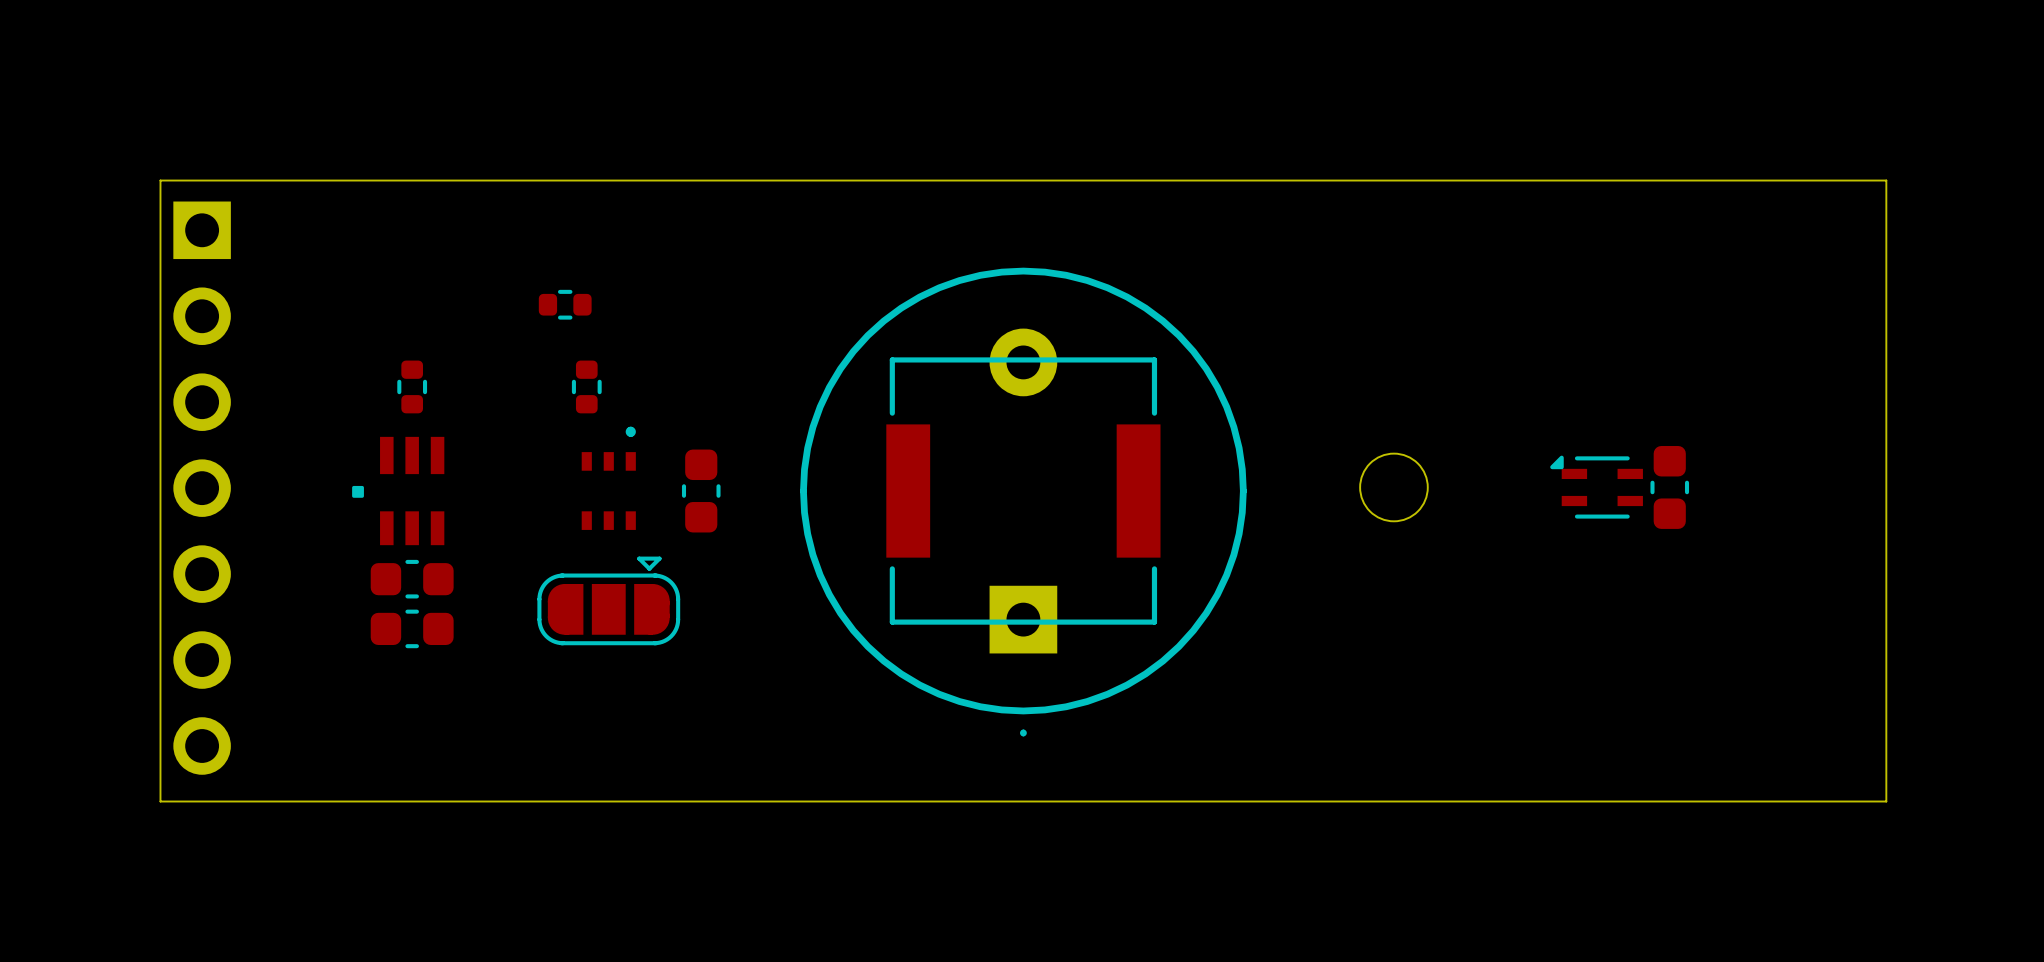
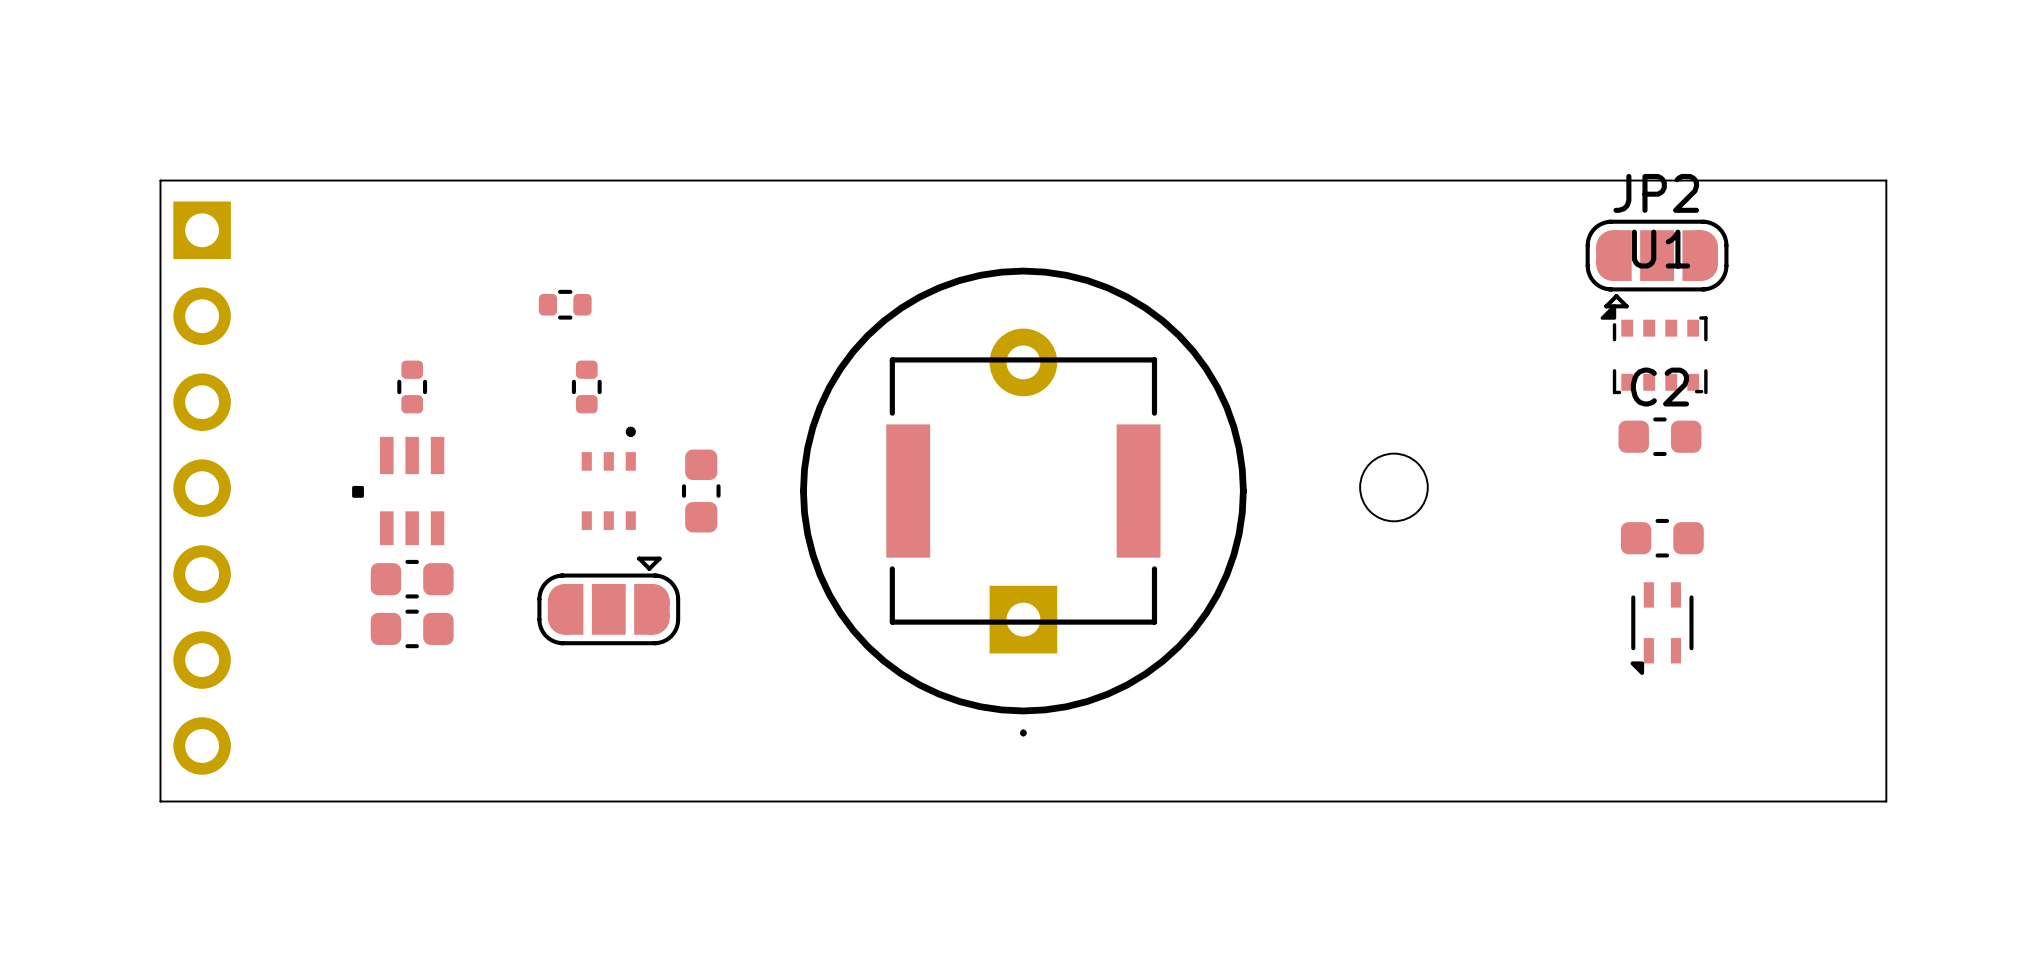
JP2: none -> (1657, 264)
U1: none -> (1654, 349)
C2: none -> (1659, 436)
part rotation: 0° (1596, 487) -> 90° counterclockwise (1662, 628)
part position: (1596, 487) -> (1662, 628)
part rotation: 0° (1669, 487) -> 90° clockwise (1662, 538)
part position: (1669, 487) -> (1662, 538)

